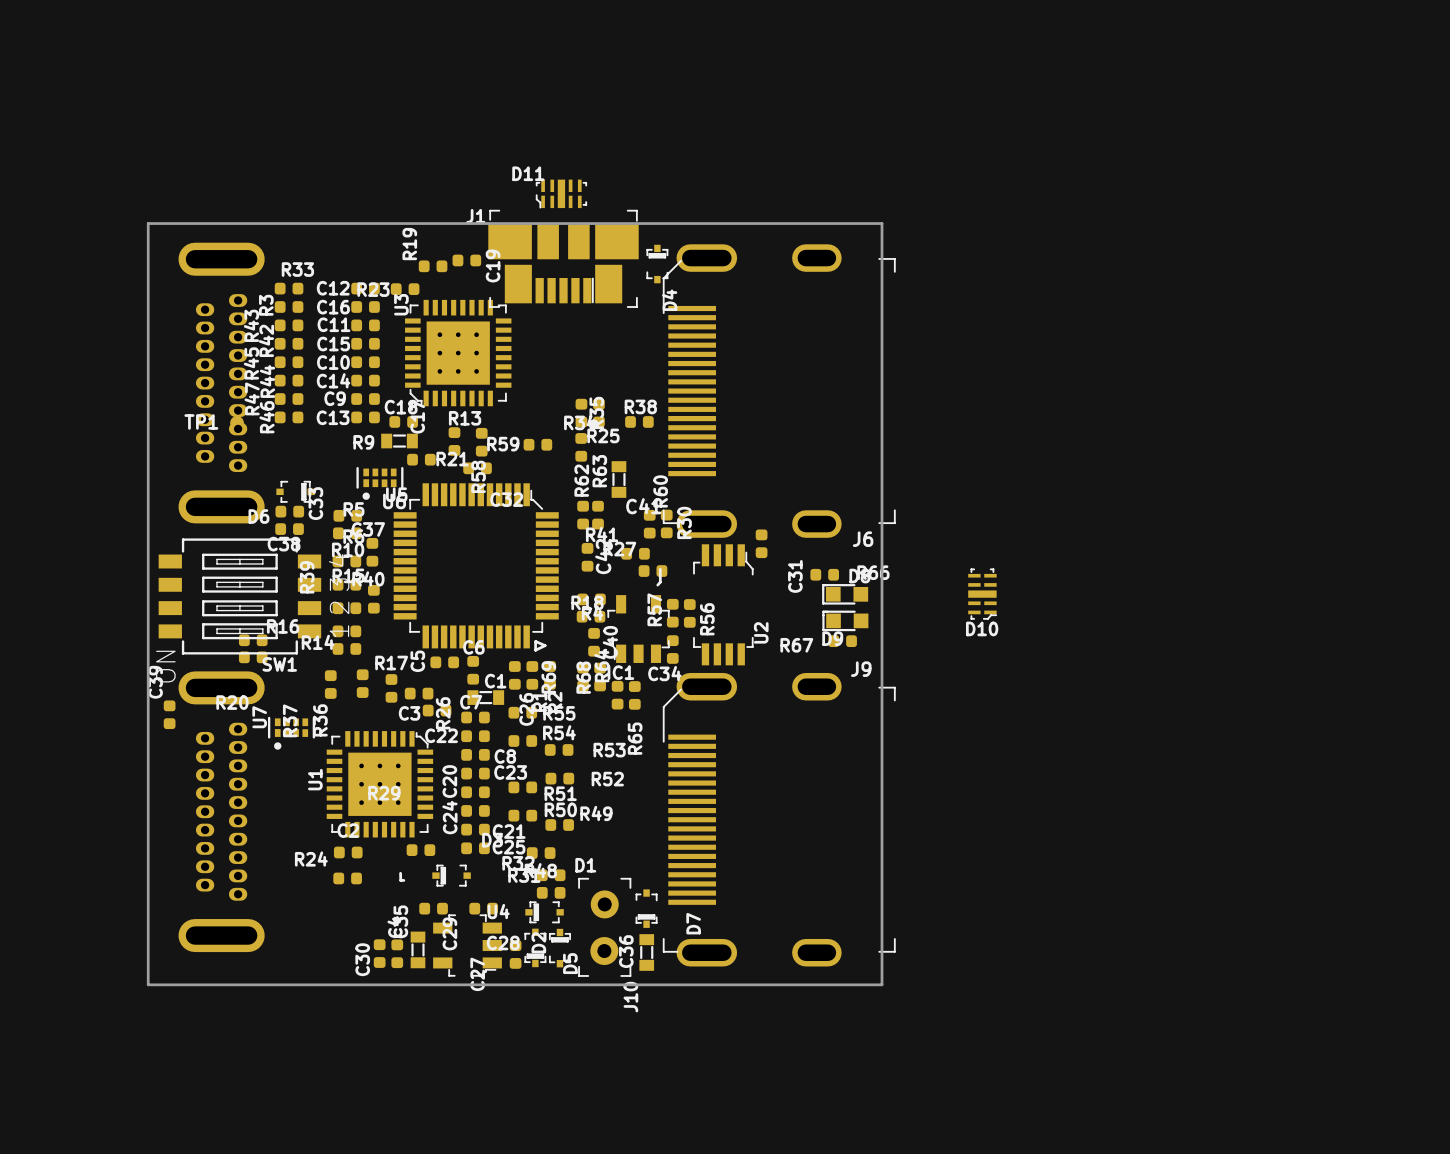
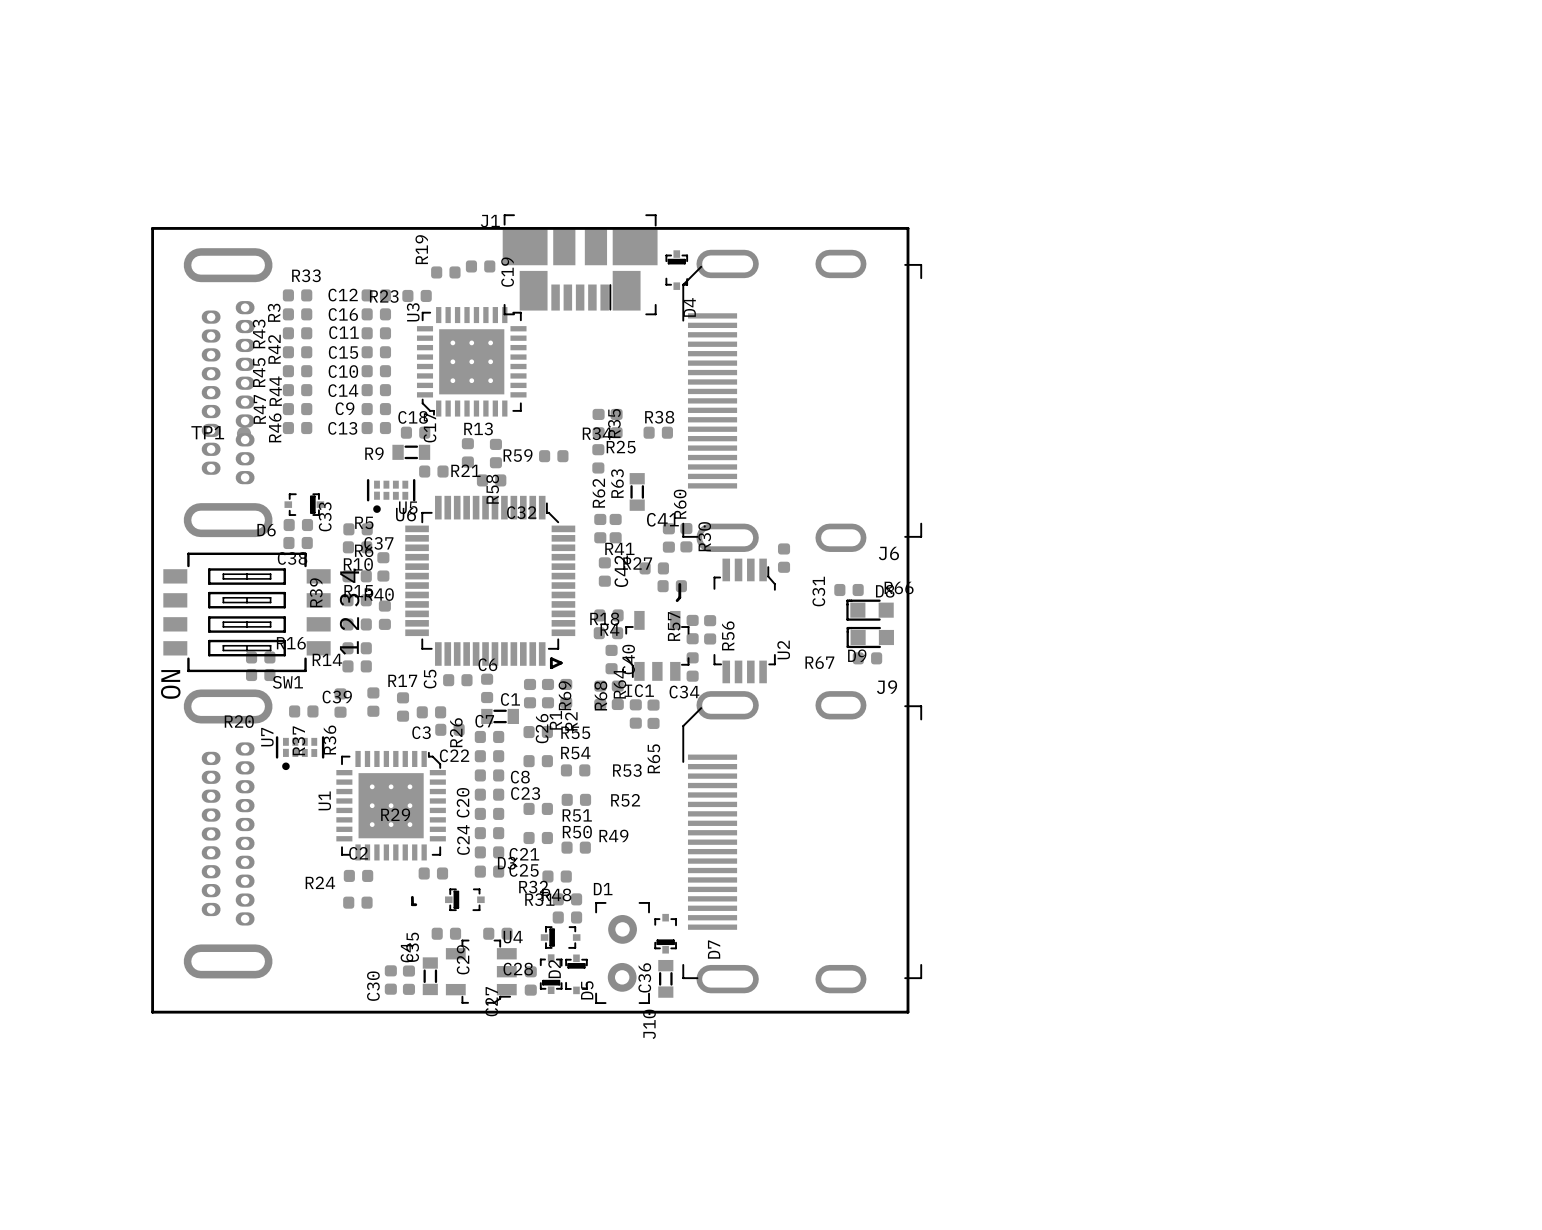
D11: (561, 194) -> none
D10: (982, 594) -> none
C39 rotation: 0° (169, 714) -> 90° clockwise (303, 711)
C39 position: (169, 714) -> (303, 711)

